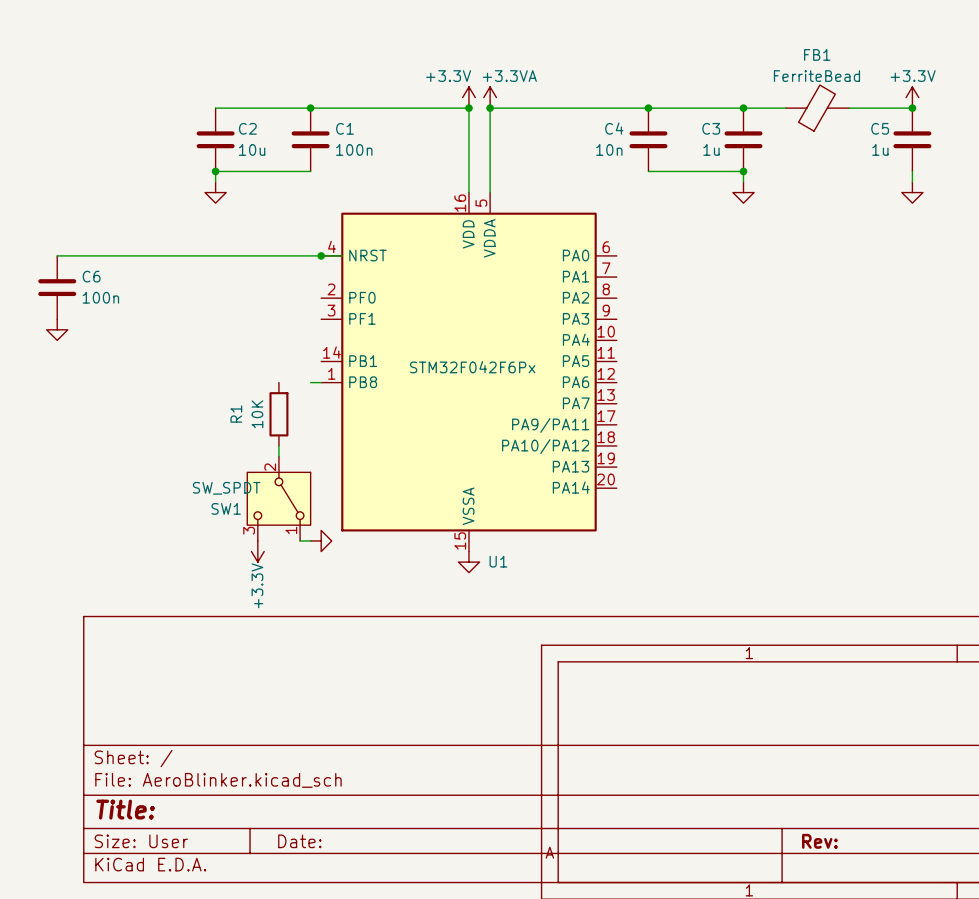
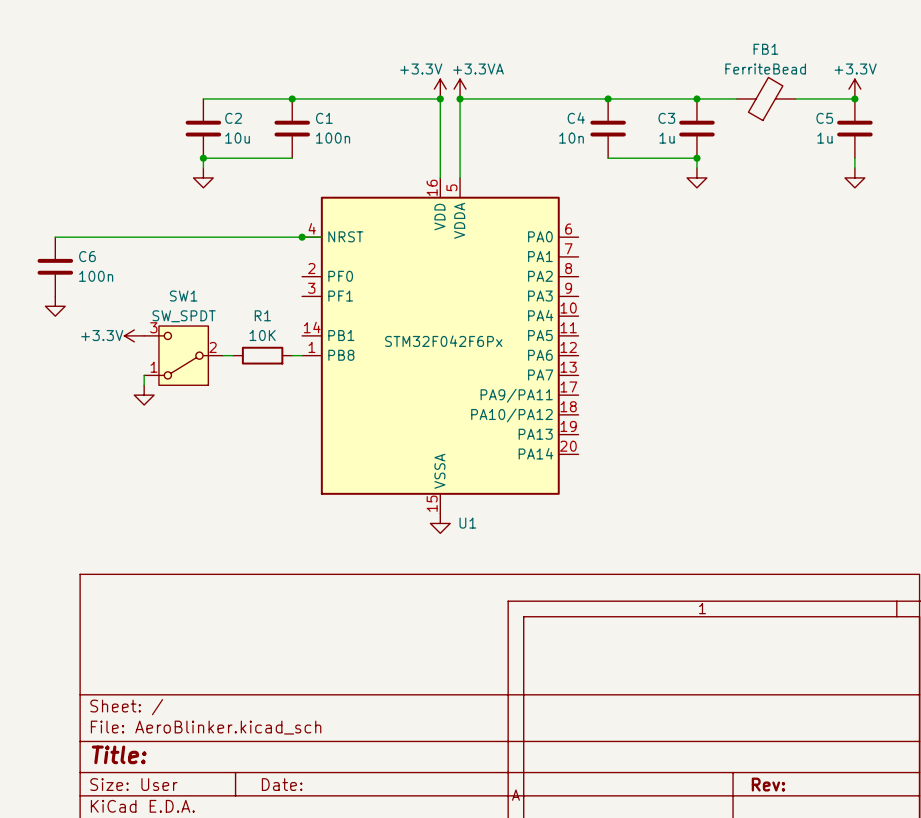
power symbol: none -> +3.3V (134, 335)
R1 rotation: 0° (278, 414) -> 90° clockwise (262, 355)
wire: (278, 445) (278, 456) -> (144, 375) (144, 385)
SW1 rotation: 0° (278, 498) -> 90° clockwise (183, 355)
SW1 position: (278, 498) -> (183, 355)
wire: (300, 540) (310, 540) -> (223, 355) (233, 355)
power symbol rotation: 0° (321, 540) -> 90° clockwise (144, 395)
power symbol position: (321, 540) -> (144, 395)
power symbol: +3.3V (257, 551) -> none

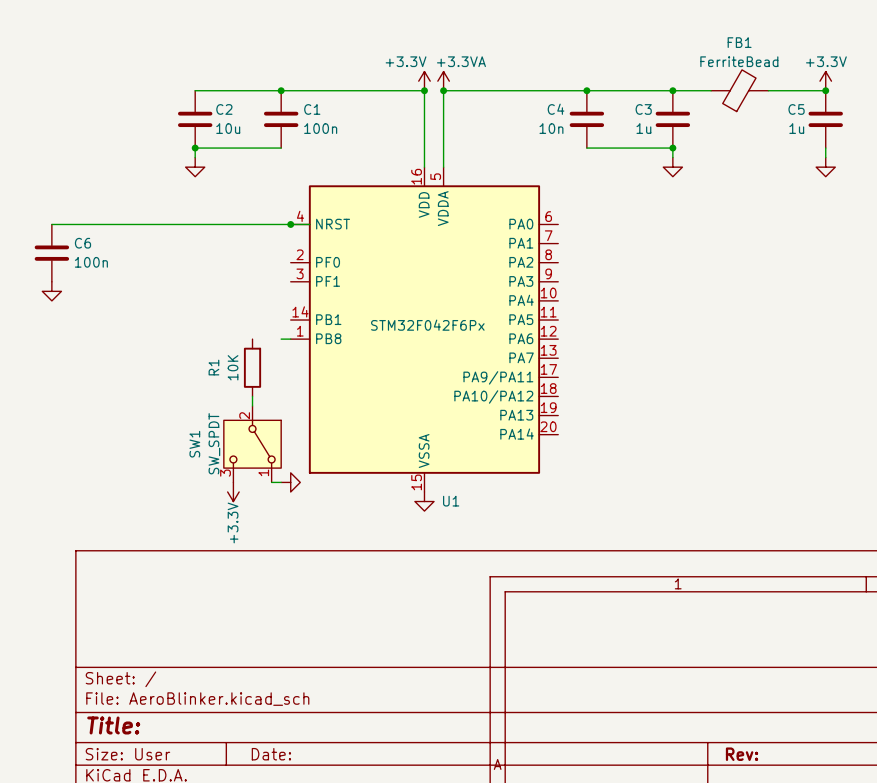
R1 name position: R1 (262, 315) -> R1 (213, 367)
power symbol: +3.3V (134, 335) -> none
R1 value position: 10K (262, 335) -> 10K (233, 367)
SW1 rotation: 0° (183, 355) -> 90° counterclockwise (252, 444)
SW1 position: (183, 355) -> (252, 444)
wire: (223, 355) (233, 355) -> (271, 482) (281, 482)
R1 rotation: 0° (262, 355) -> 90° clockwise (252, 367)
wire: (144, 375) (144, 385) -> (252, 396) (252, 405)
power symbol rotation: 0° (144, 395) -> 90° counterclockwise (290, 482)
power symbol position: (144, 395) -> (290, 482)
power symbol: none -> +3.3V (233, 491)

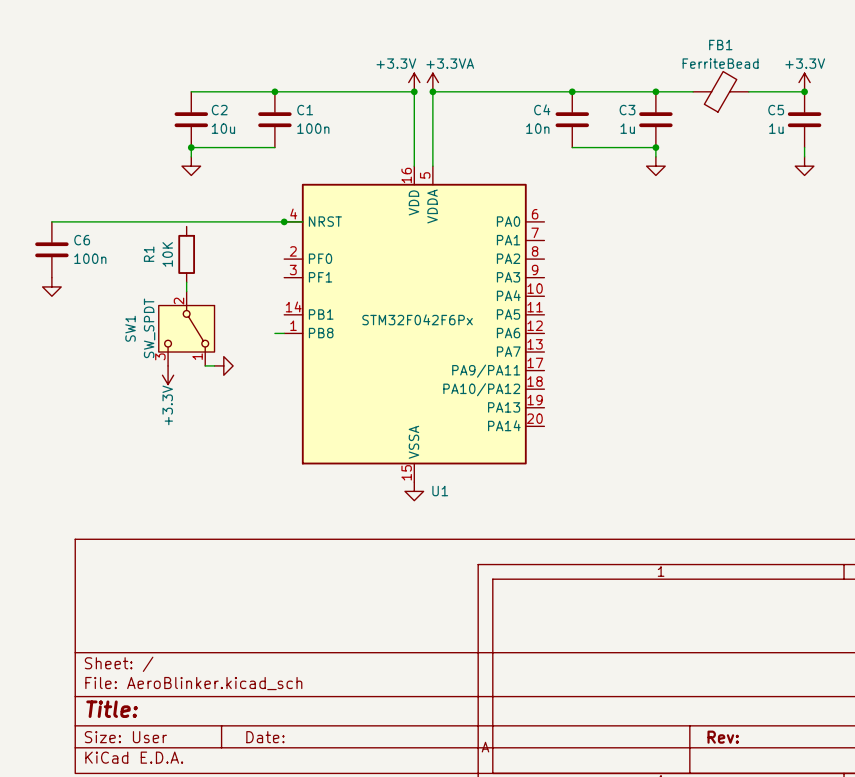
R1 position: (252, 367) -> (186, 254)
wire: (252, 396) (252, 405) -> (186, 282) (186, 291)
SW1 position: (252, 444) -> (186, 328)
wire: (271, 482) (281, 482) -> (205, 365) (214, 365)
power symbol position: (290, 482) -> (223, 365)
power symbol position: +3.3V (233, 491) -> +3.3V (168, 375)

